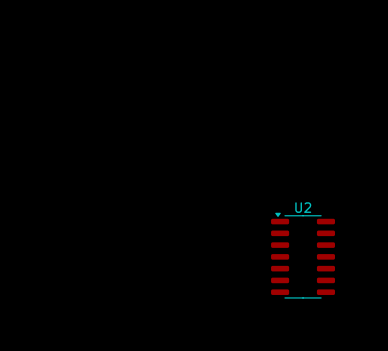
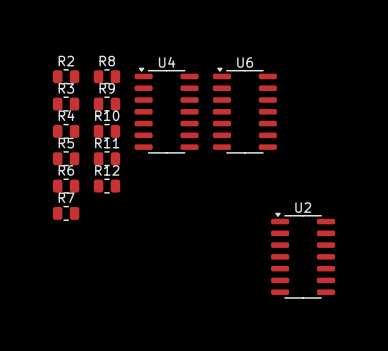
R2: none -> (66, 76)
R8: none -> (107, 76)
R3: none -> (66, 104)
R9: none -> (107, 104)
U4: none -> (166, 110)
U6: none -> (244, 110)
R4: none -> (66, 131)
R10: none -> (107, 131)
R5: none -> (66, 158)
R11: none -> (107, 158)
R6: none -> (66, 186)
R12: none -> (107, 186)
R7: none -> (66, 213)

